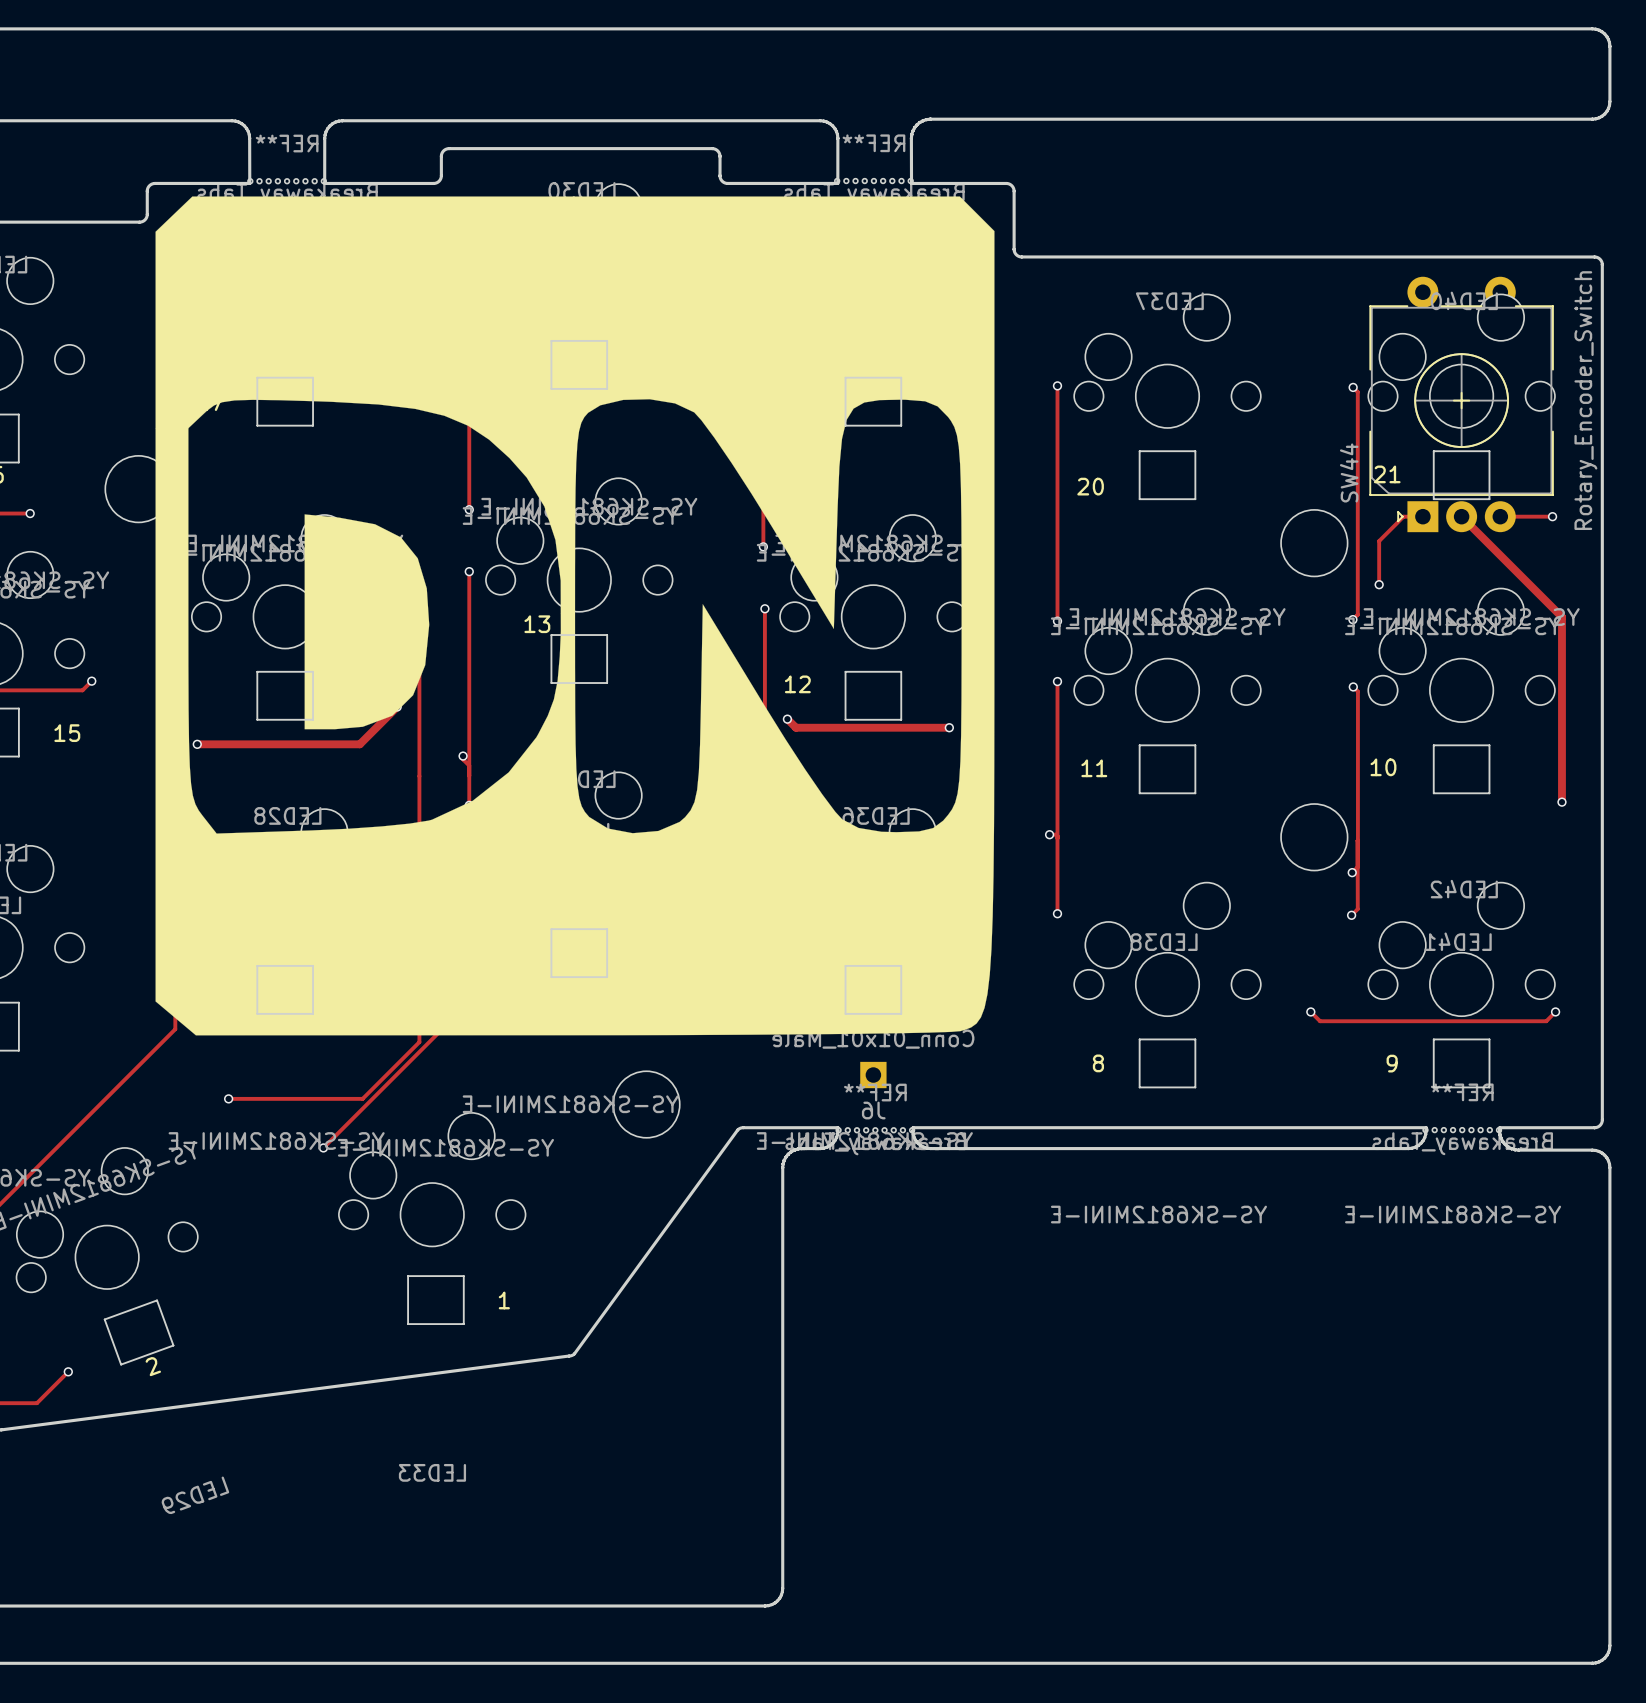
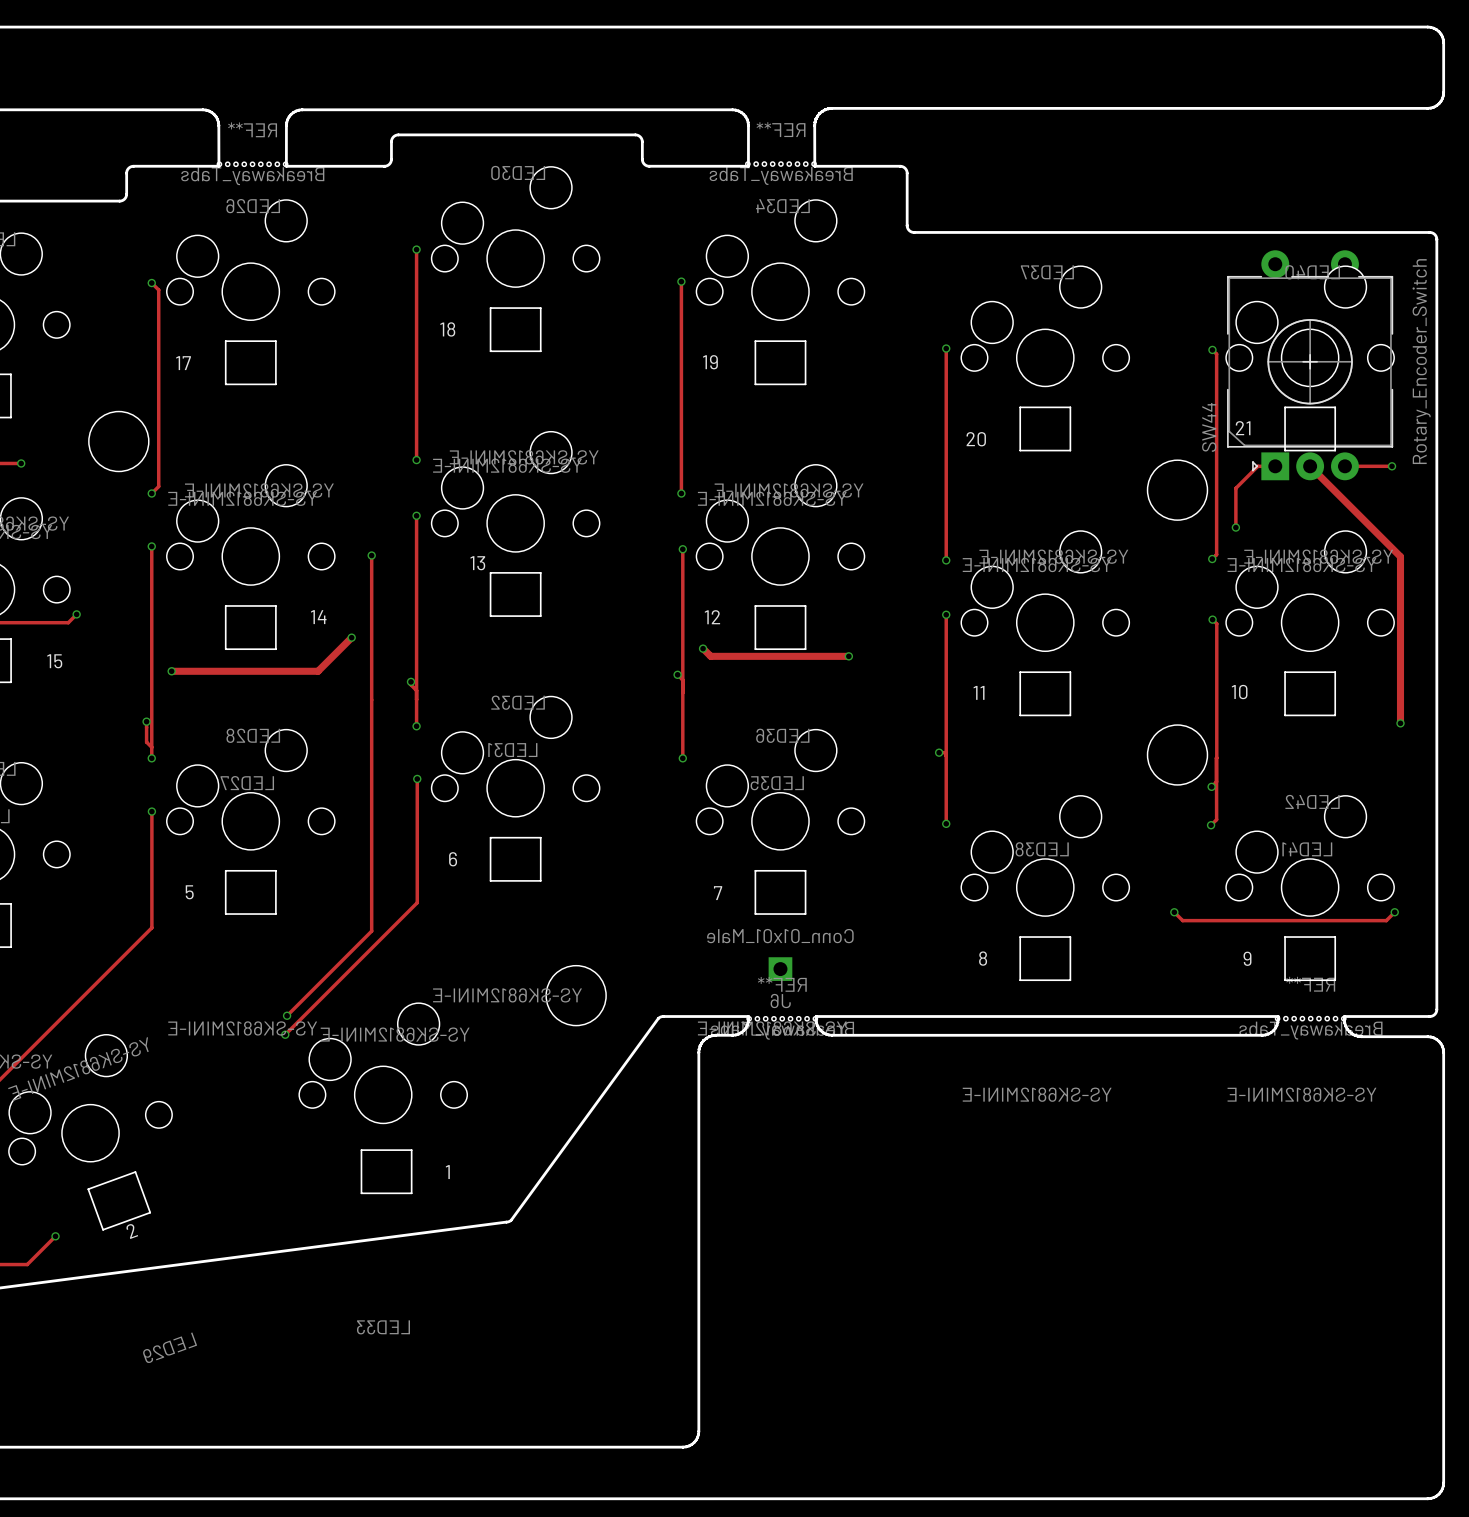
drawing: [155, 196, 995, 1036] -> none
track: (419, 1032) (419, 1042) (362, 1098) (228, 1098) -> (371, 931) (287, 1015)
via: (228, 1098) -> none
via: none -> (287, 1015)

